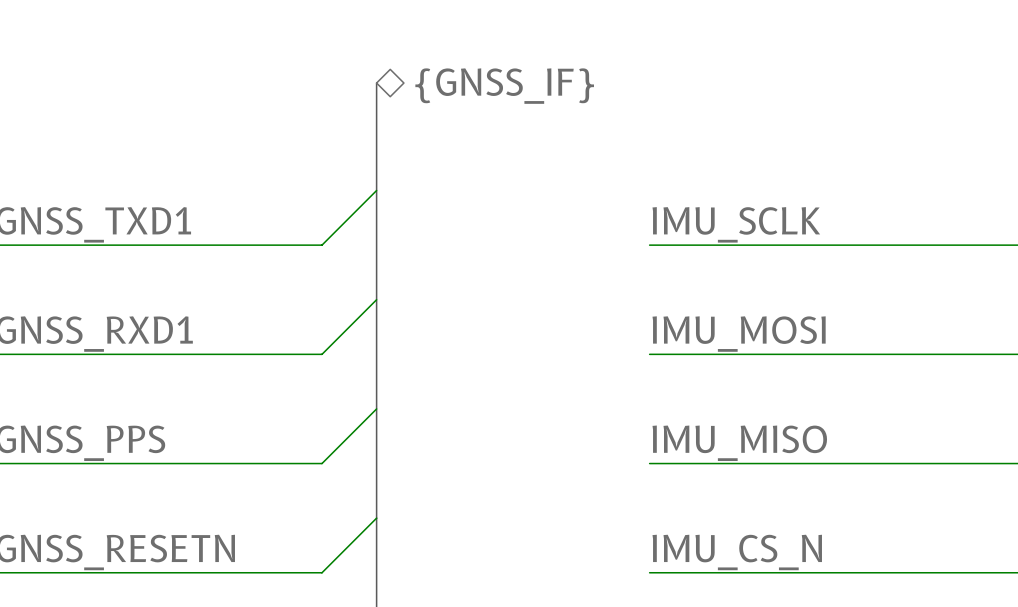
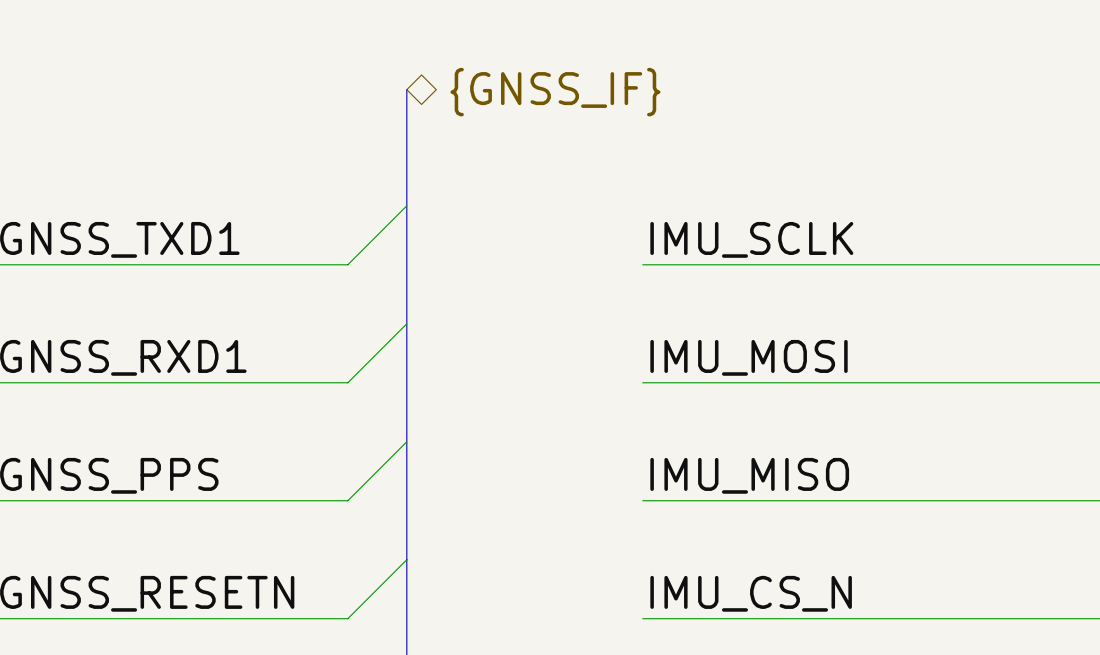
label position: IMU_SCLK (736, 224) -> IMU_SCLK (751, 239)
wire: none -> (642, 264) (701, 264)
label position: IMU_MOSI (739, 334) -> IMU_MOSI (749, 357)
wire: none -> (642, 382) (701, 382)
label position: IMU_MISO (739, 443) -> IMU_MISO (749, 475)
wire: none -> (642, 500) (701, 500)
label position: IMU_CS_N (737, 552) -> IMU_CS_N (751, 593)
wire: none -> (642, 618) (701, 618)

